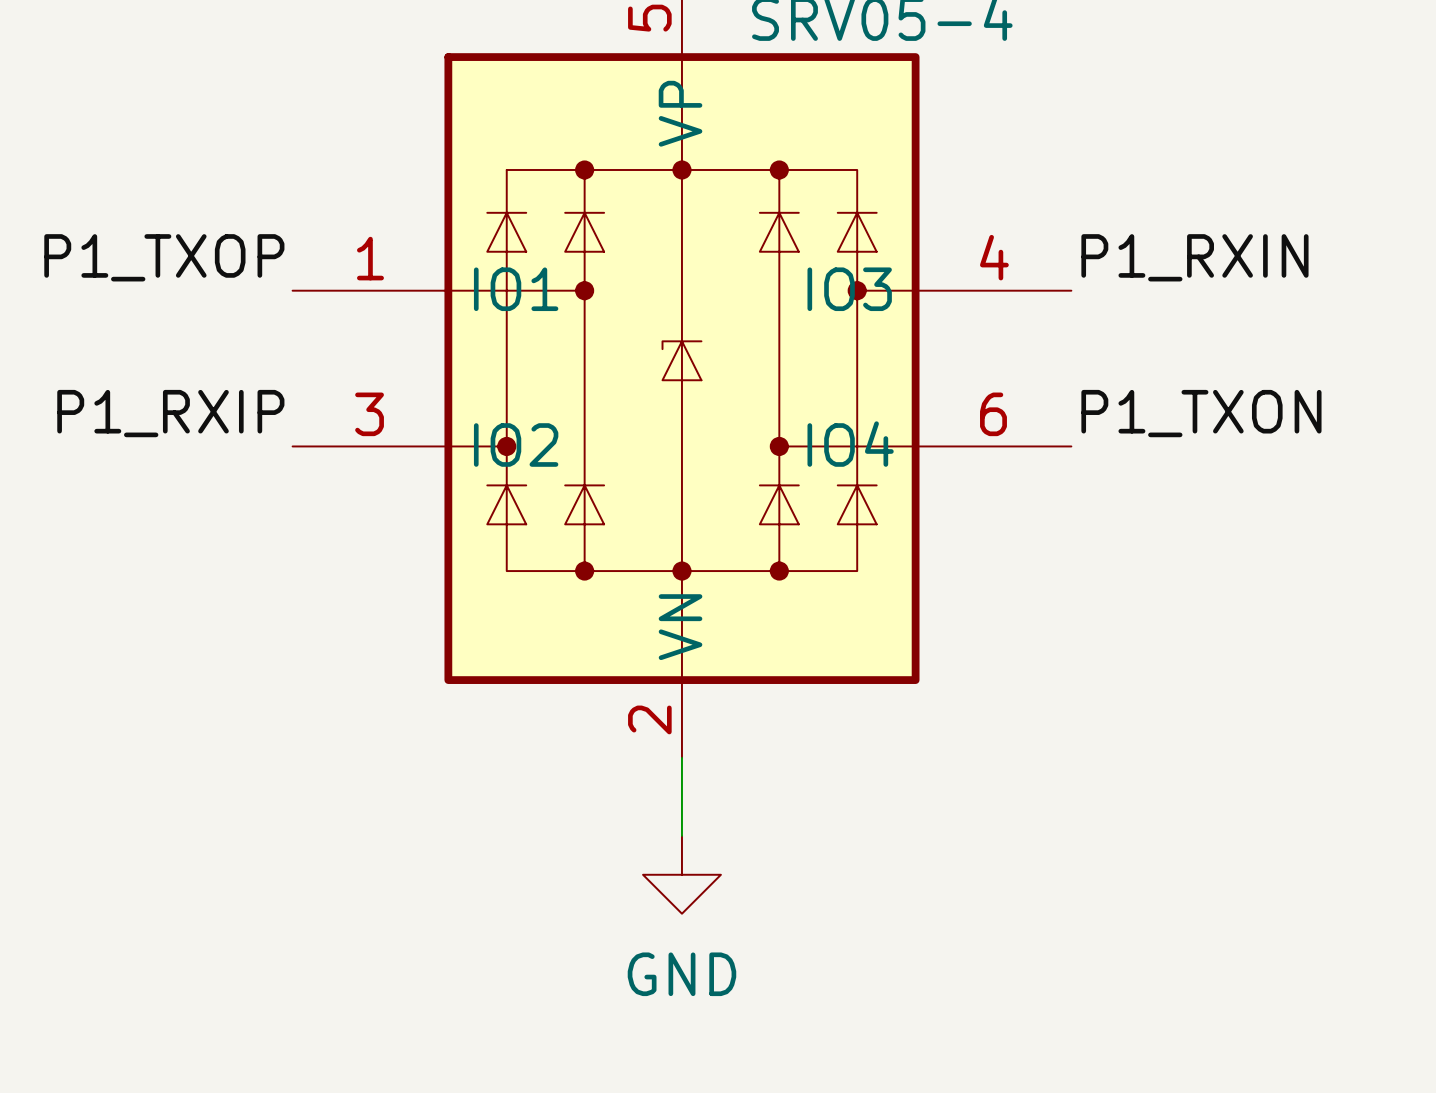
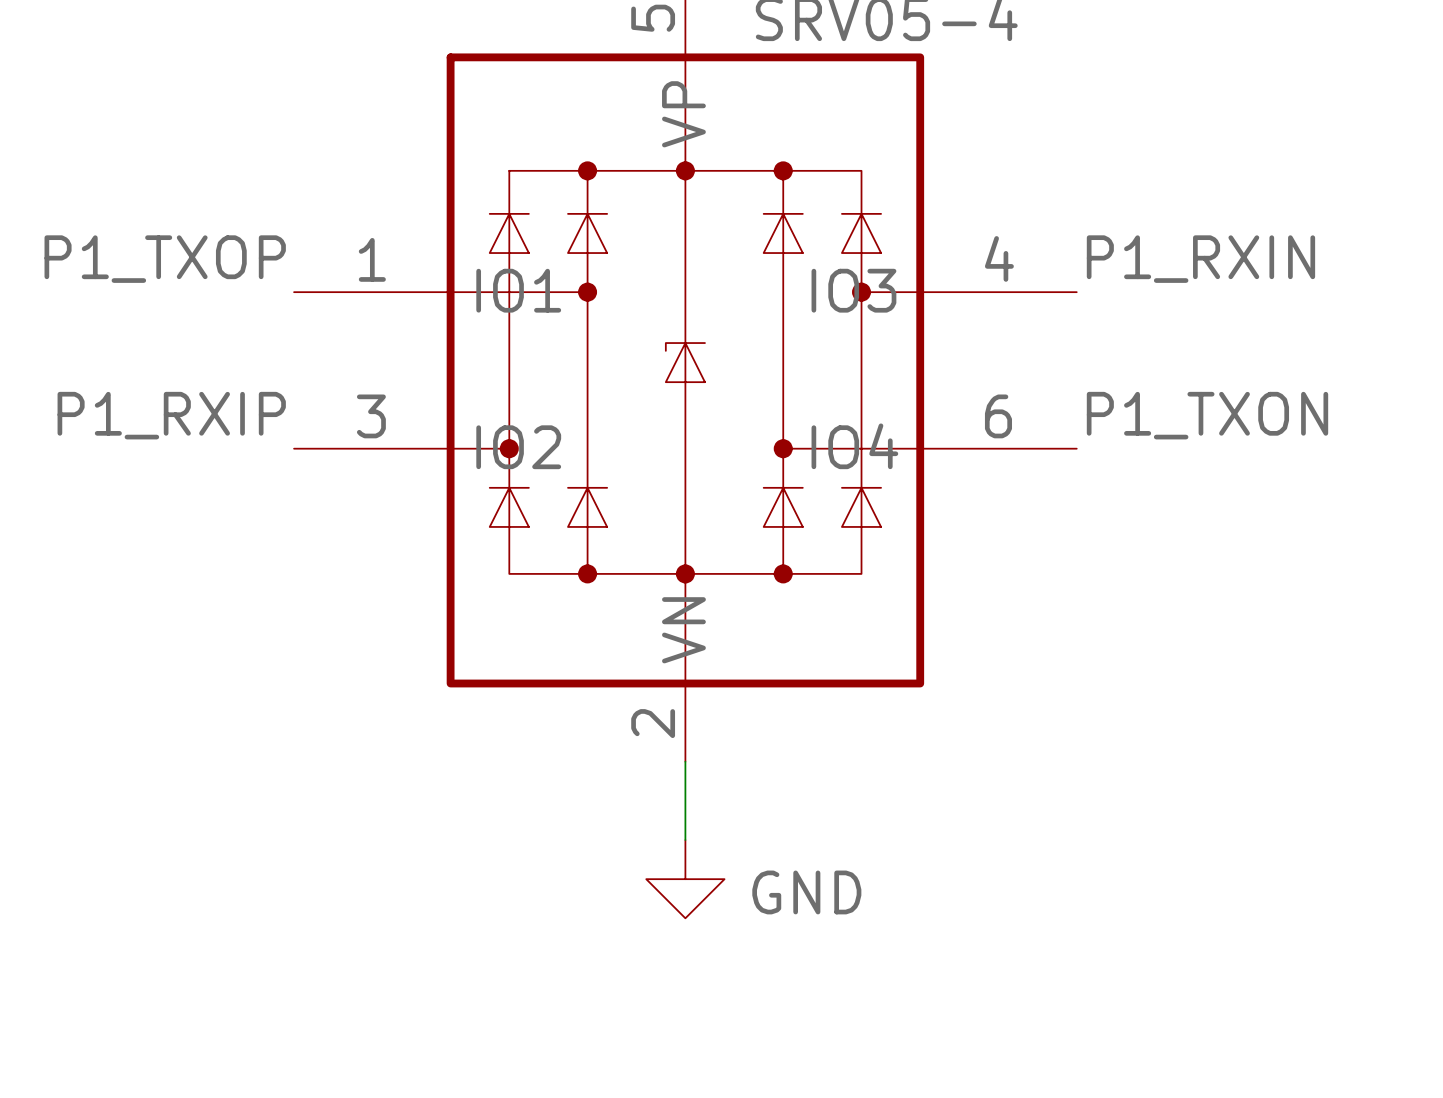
power symbol text position: GND (681, 974) -> GND (806, 892)

